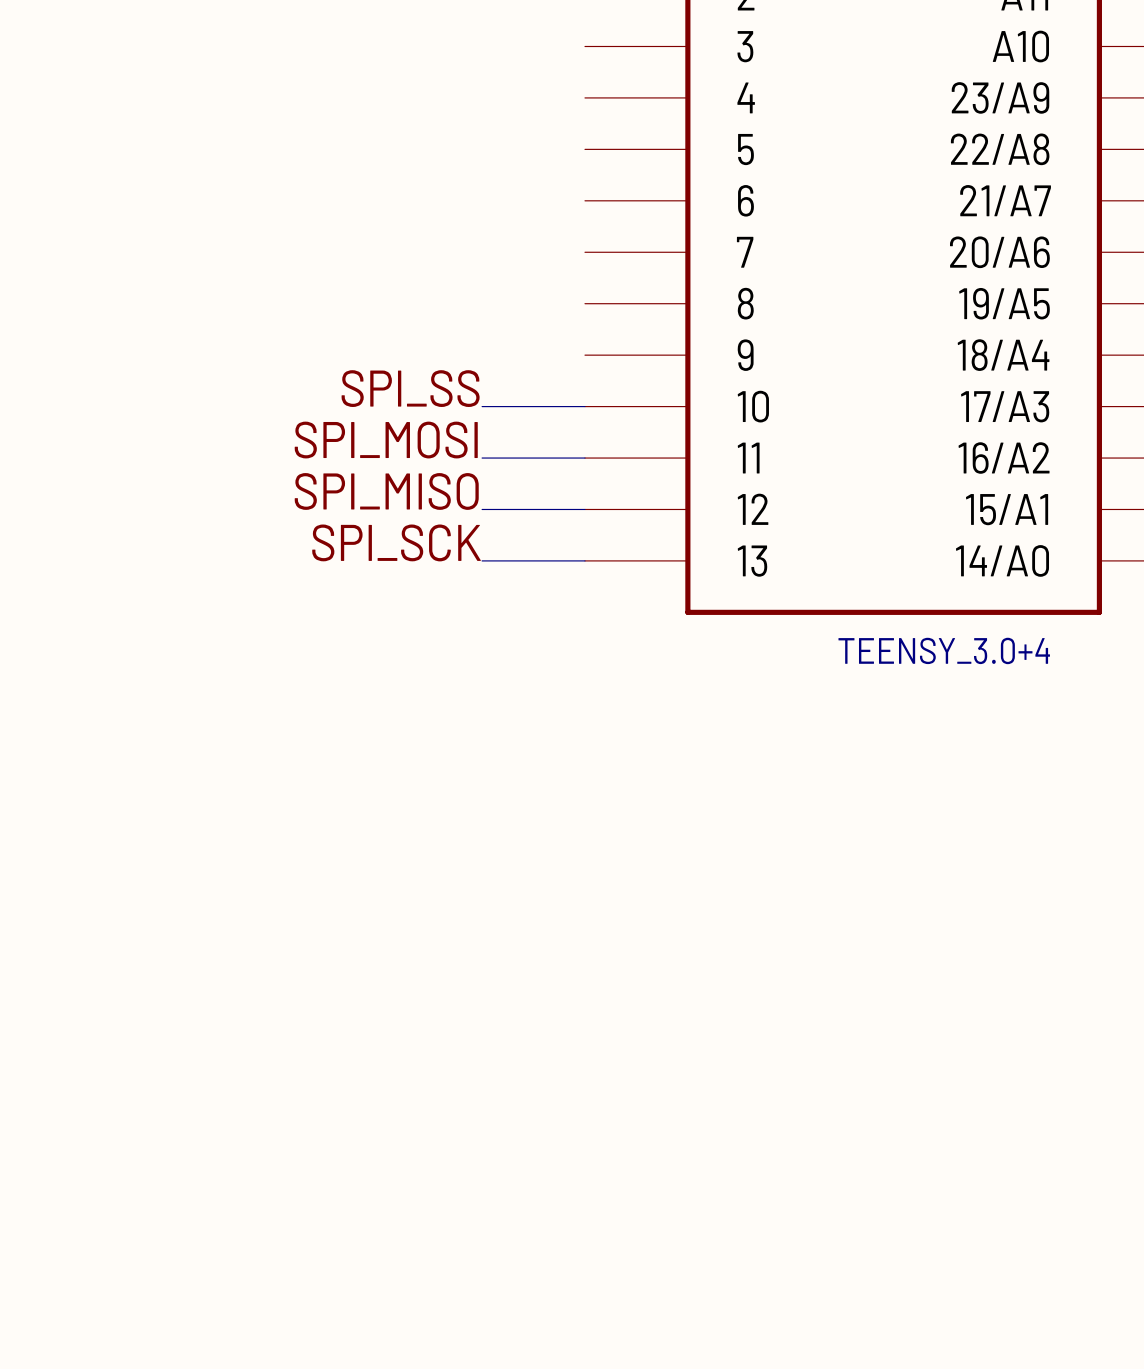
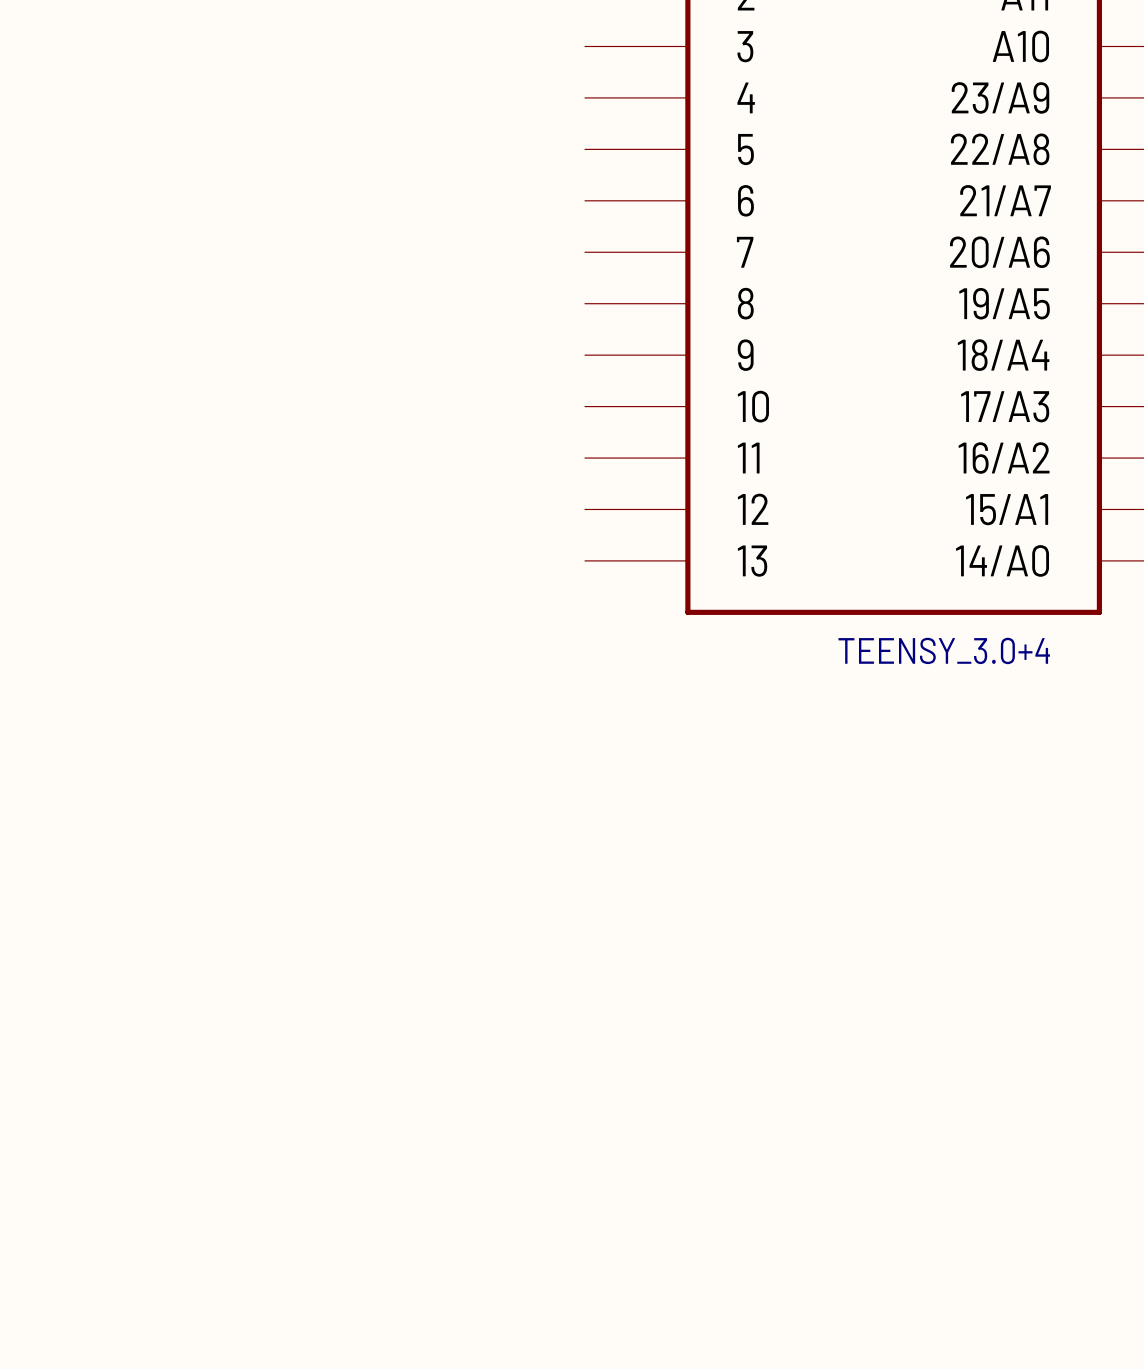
label: SPI_SS (410, 388) -> none
wire: (482, 406) (584, 406) -> none
label: SPI_MOSI (386, 440) -> none
wire: (482, 458) (584, 458) -> none
label: SPI_MISO (386, 491) -> none
wire: (482, 509) (584, 509) -> none
label: SPI_SCK (396, 542) -> none
wire: (482, 560) (584, 560) -> none

